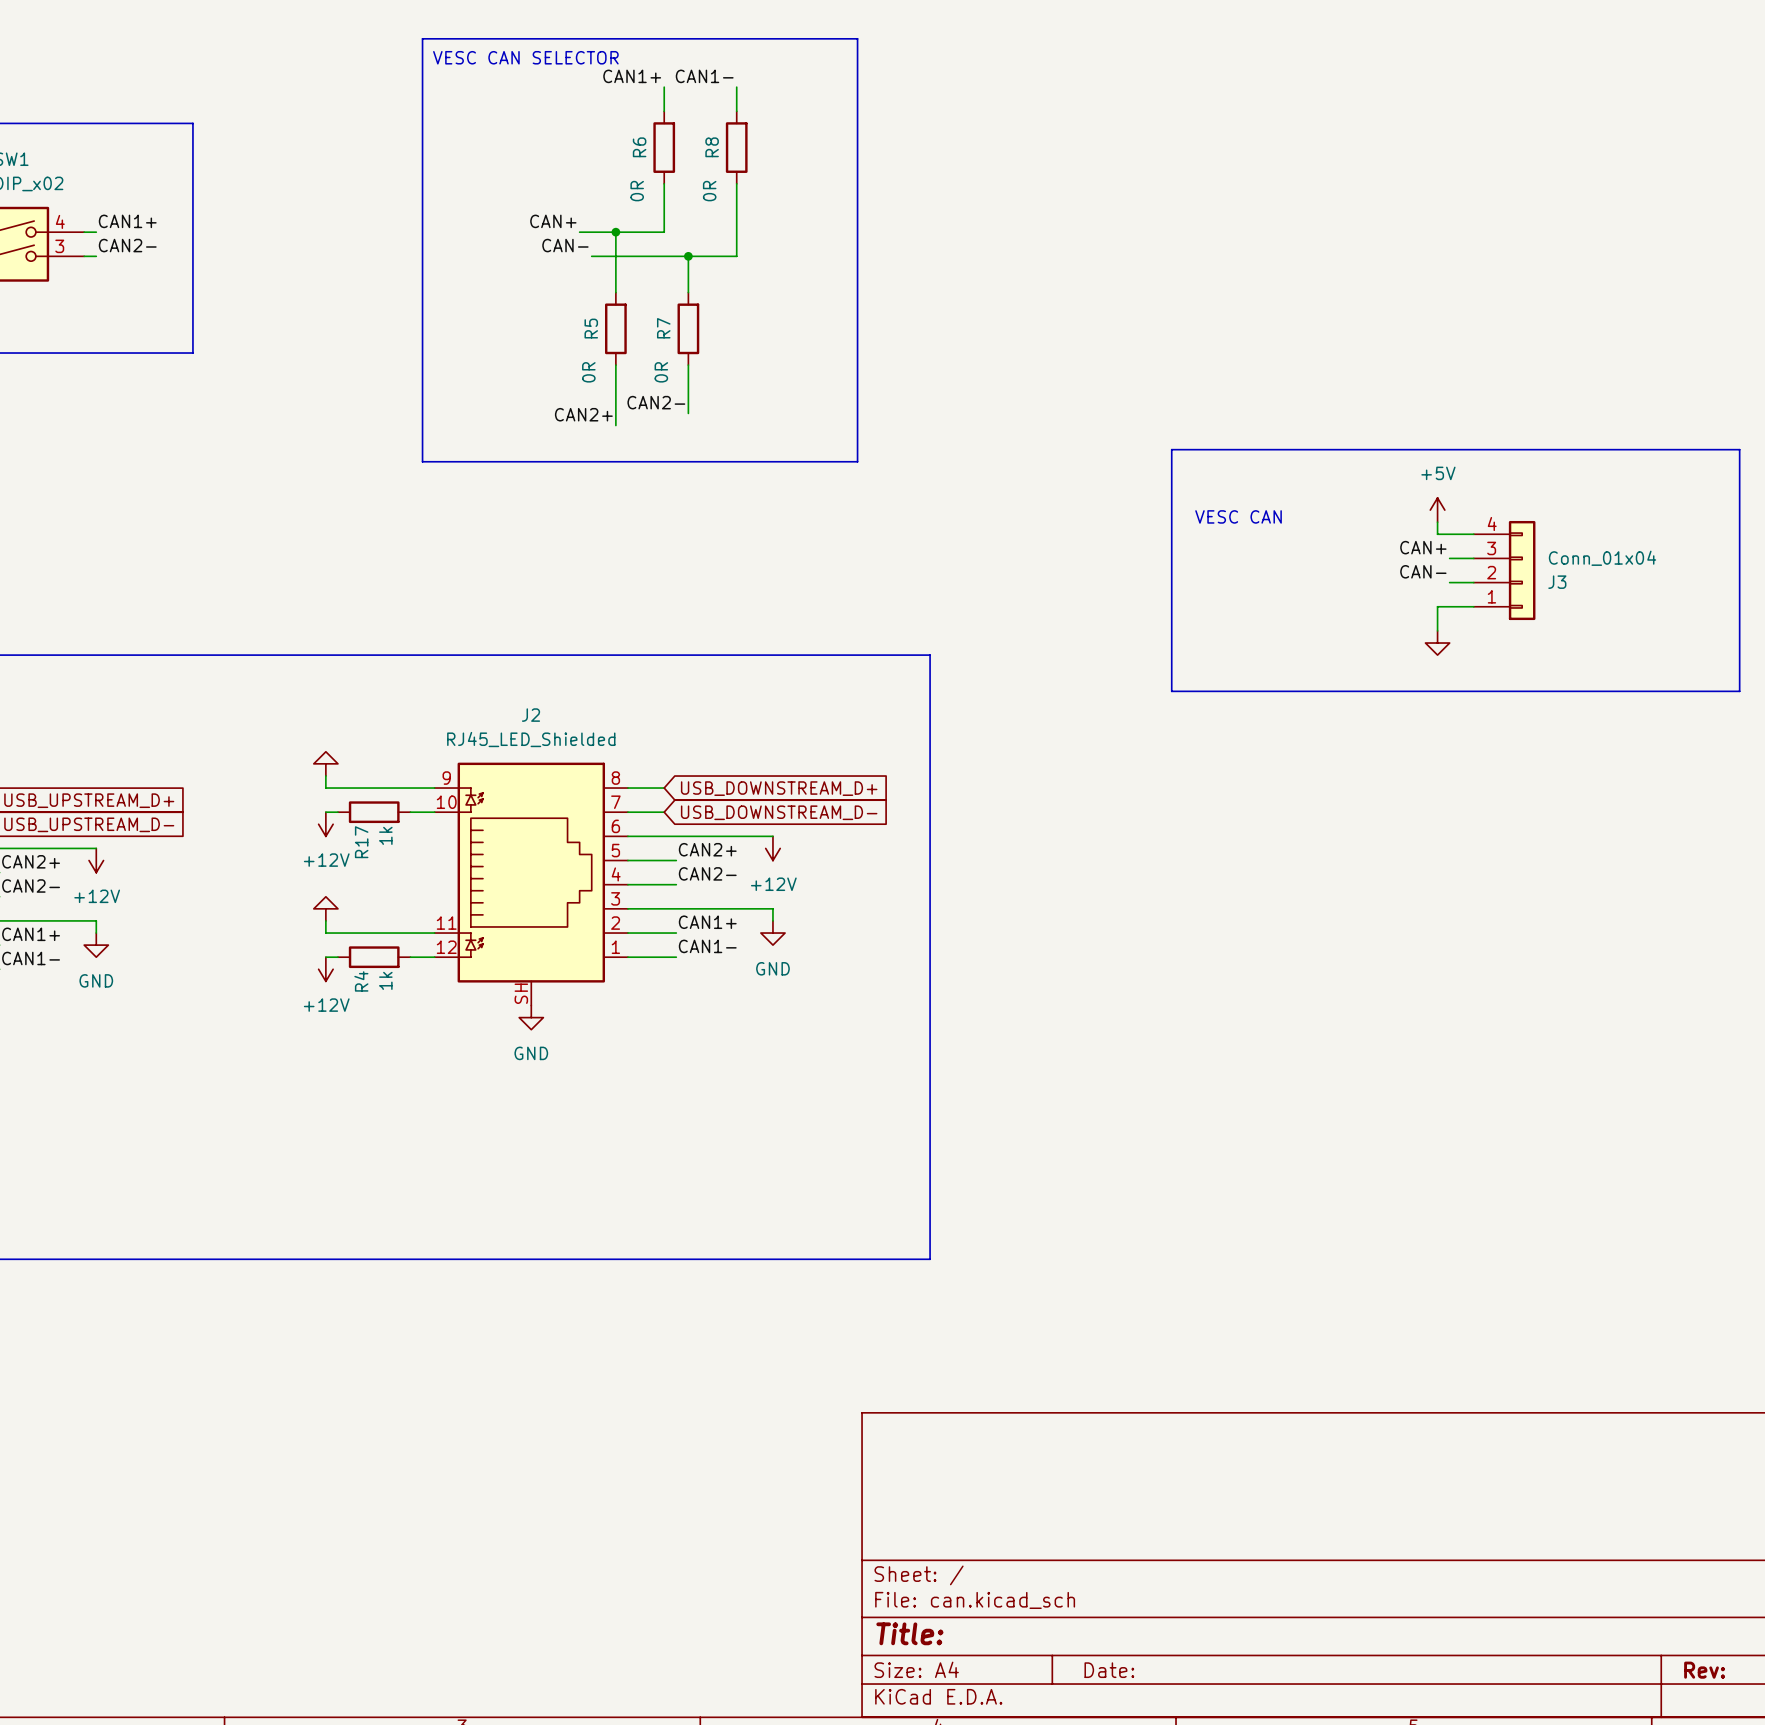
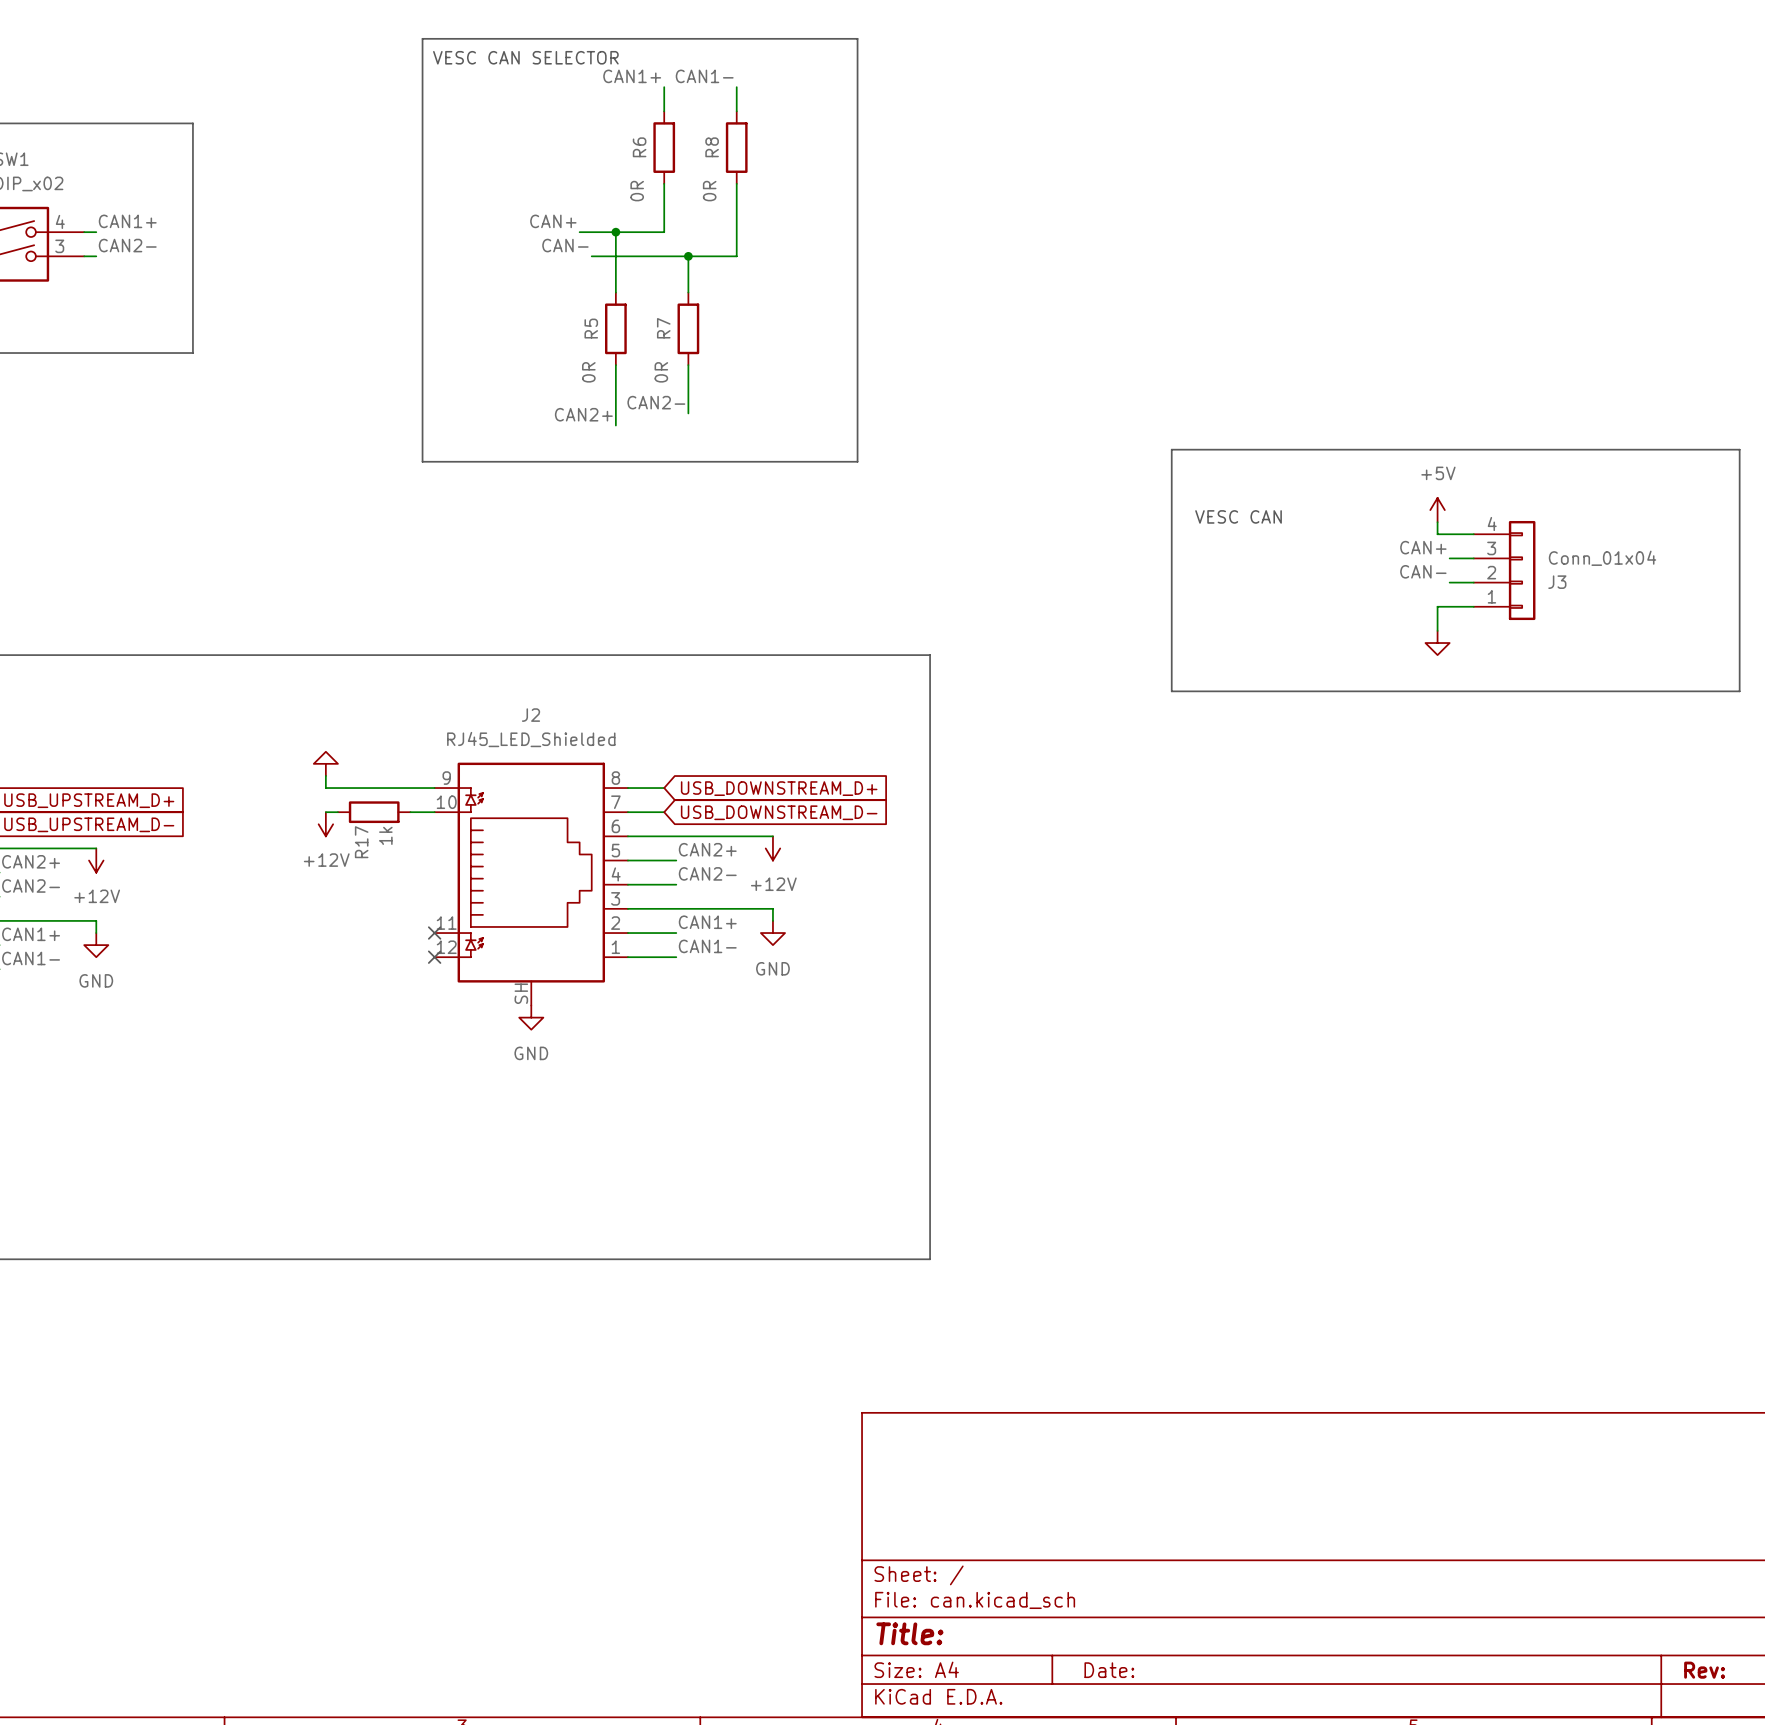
power symbol: (325, 908) -> none
wire: (325, 920) (325, 933) (434, 933) -> none
no-connect mark: none -> (434, 933)
wire: (325, 957) (337, 957) -> none
R4: 1k (374, 957) -> none
wire: (410, 957) (434, 957) -> none
no-connect mark: none -> (434, 957)
power symbol: +12V (325, 969) -> none

